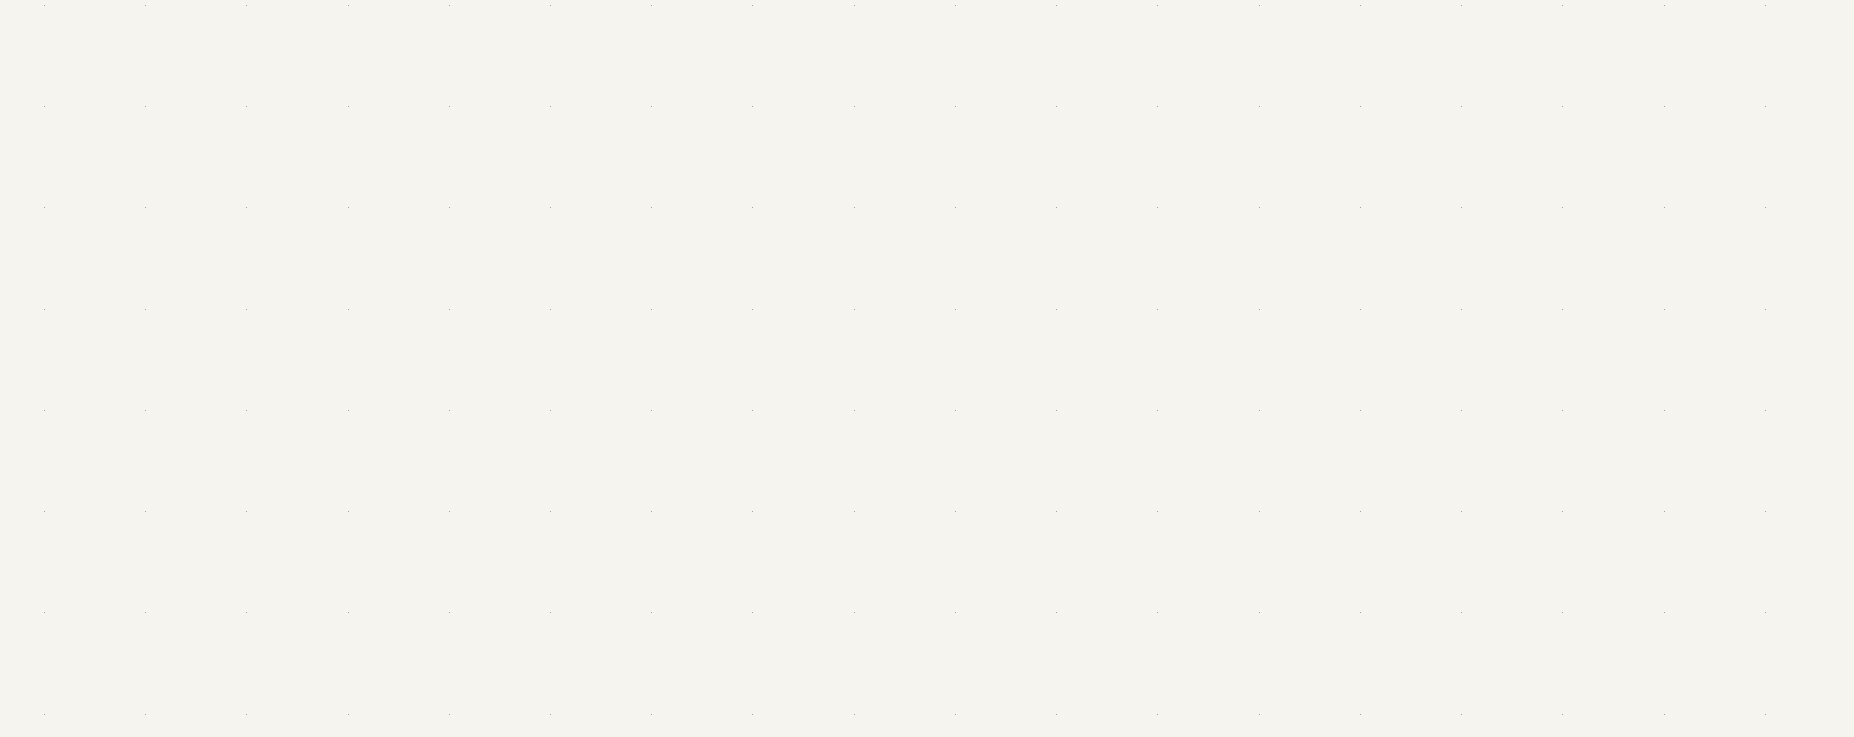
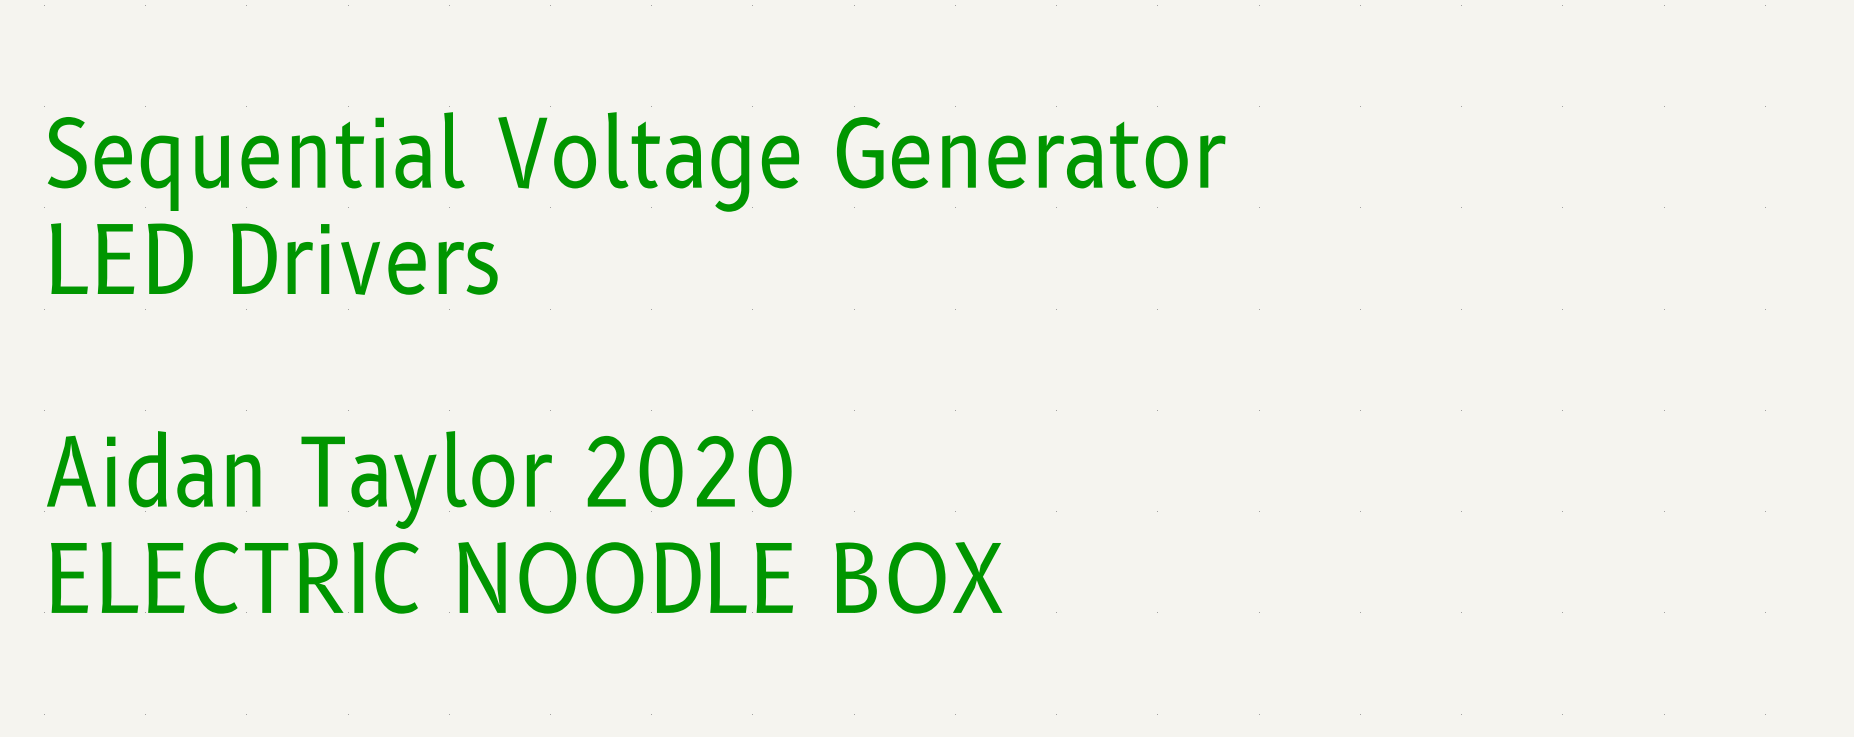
text: none -> Sequential Voltage Generator (636, 161)
text: none -> LED Drivers (274, 259)
text: none -> Aidan Taylor 2020 (419, 480)
text: none -> ELECTRIC NOODLE BOX (526, 577)

